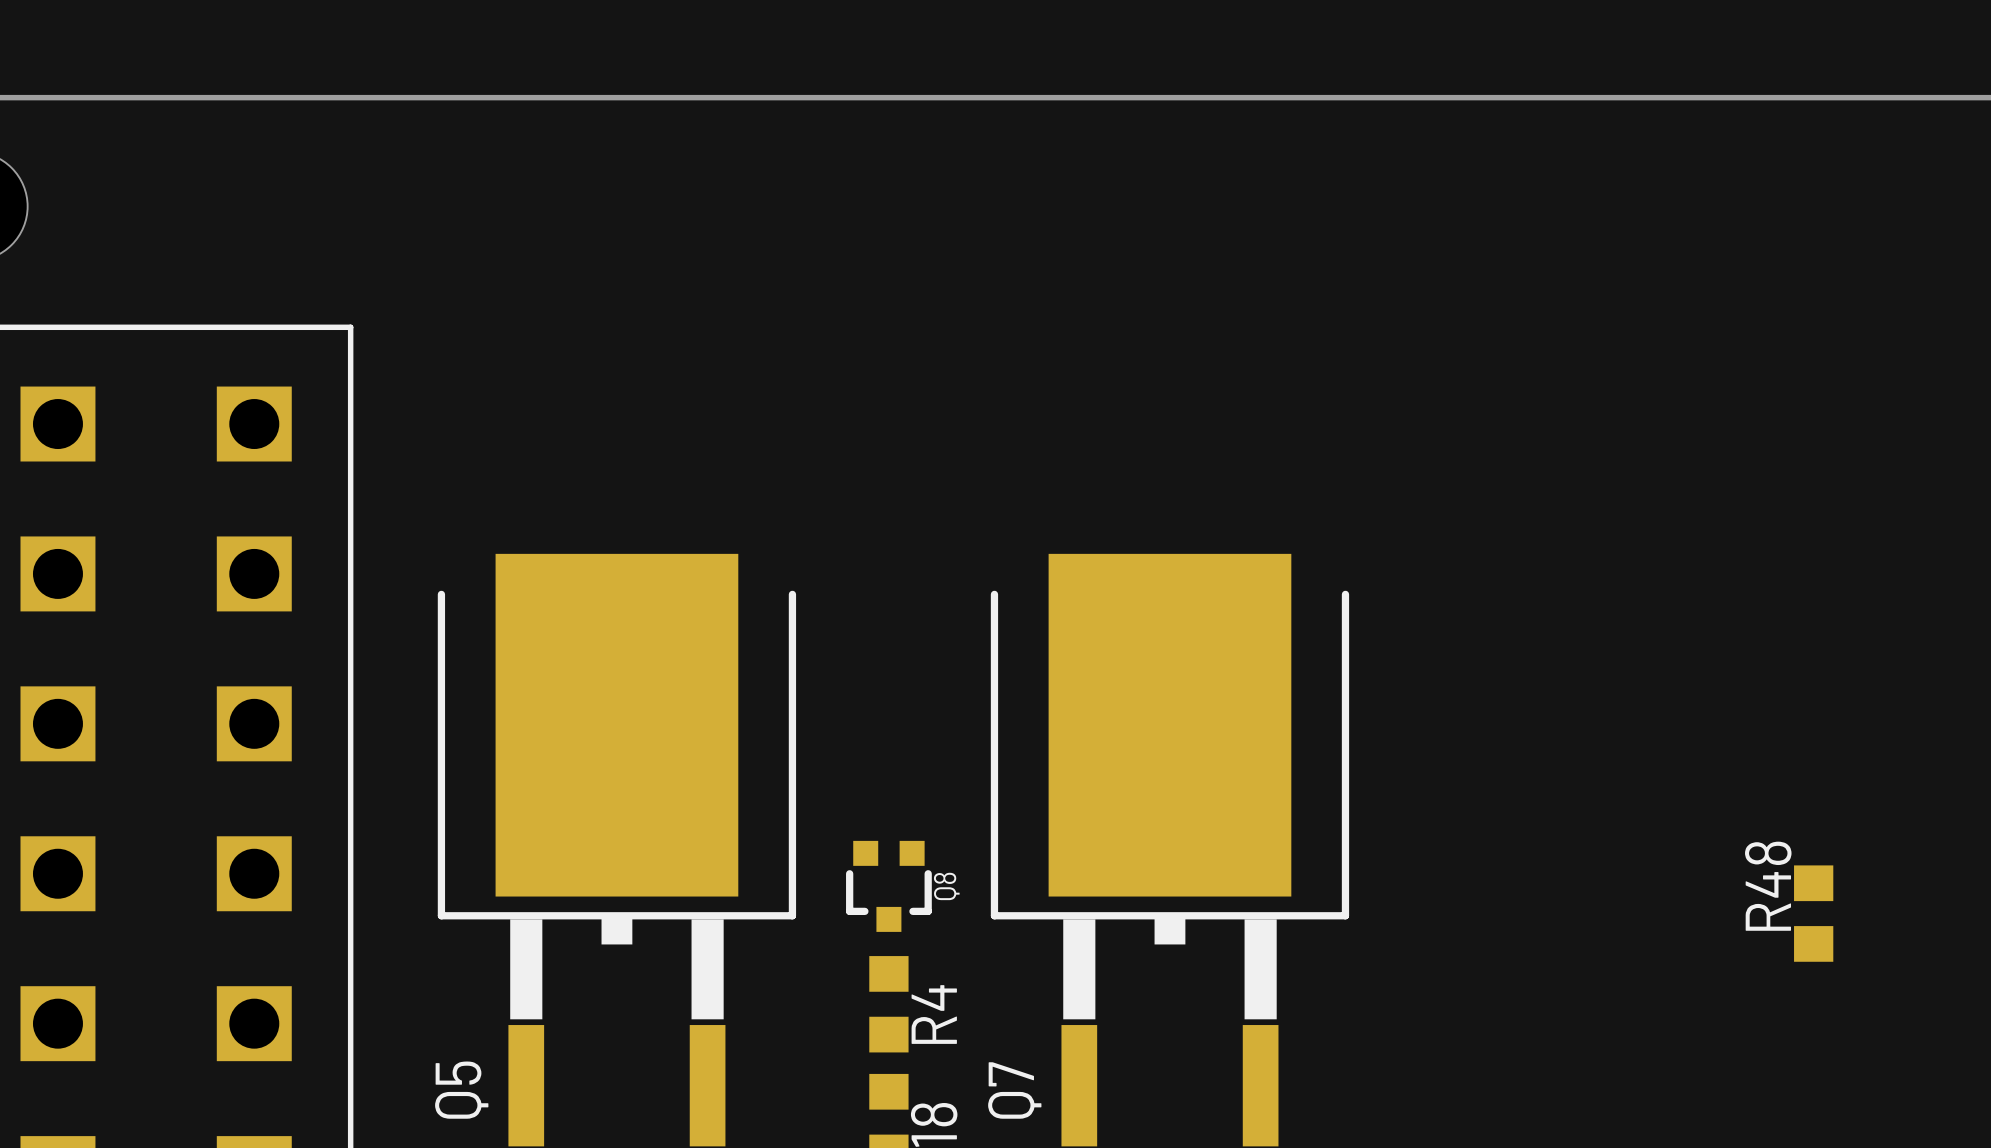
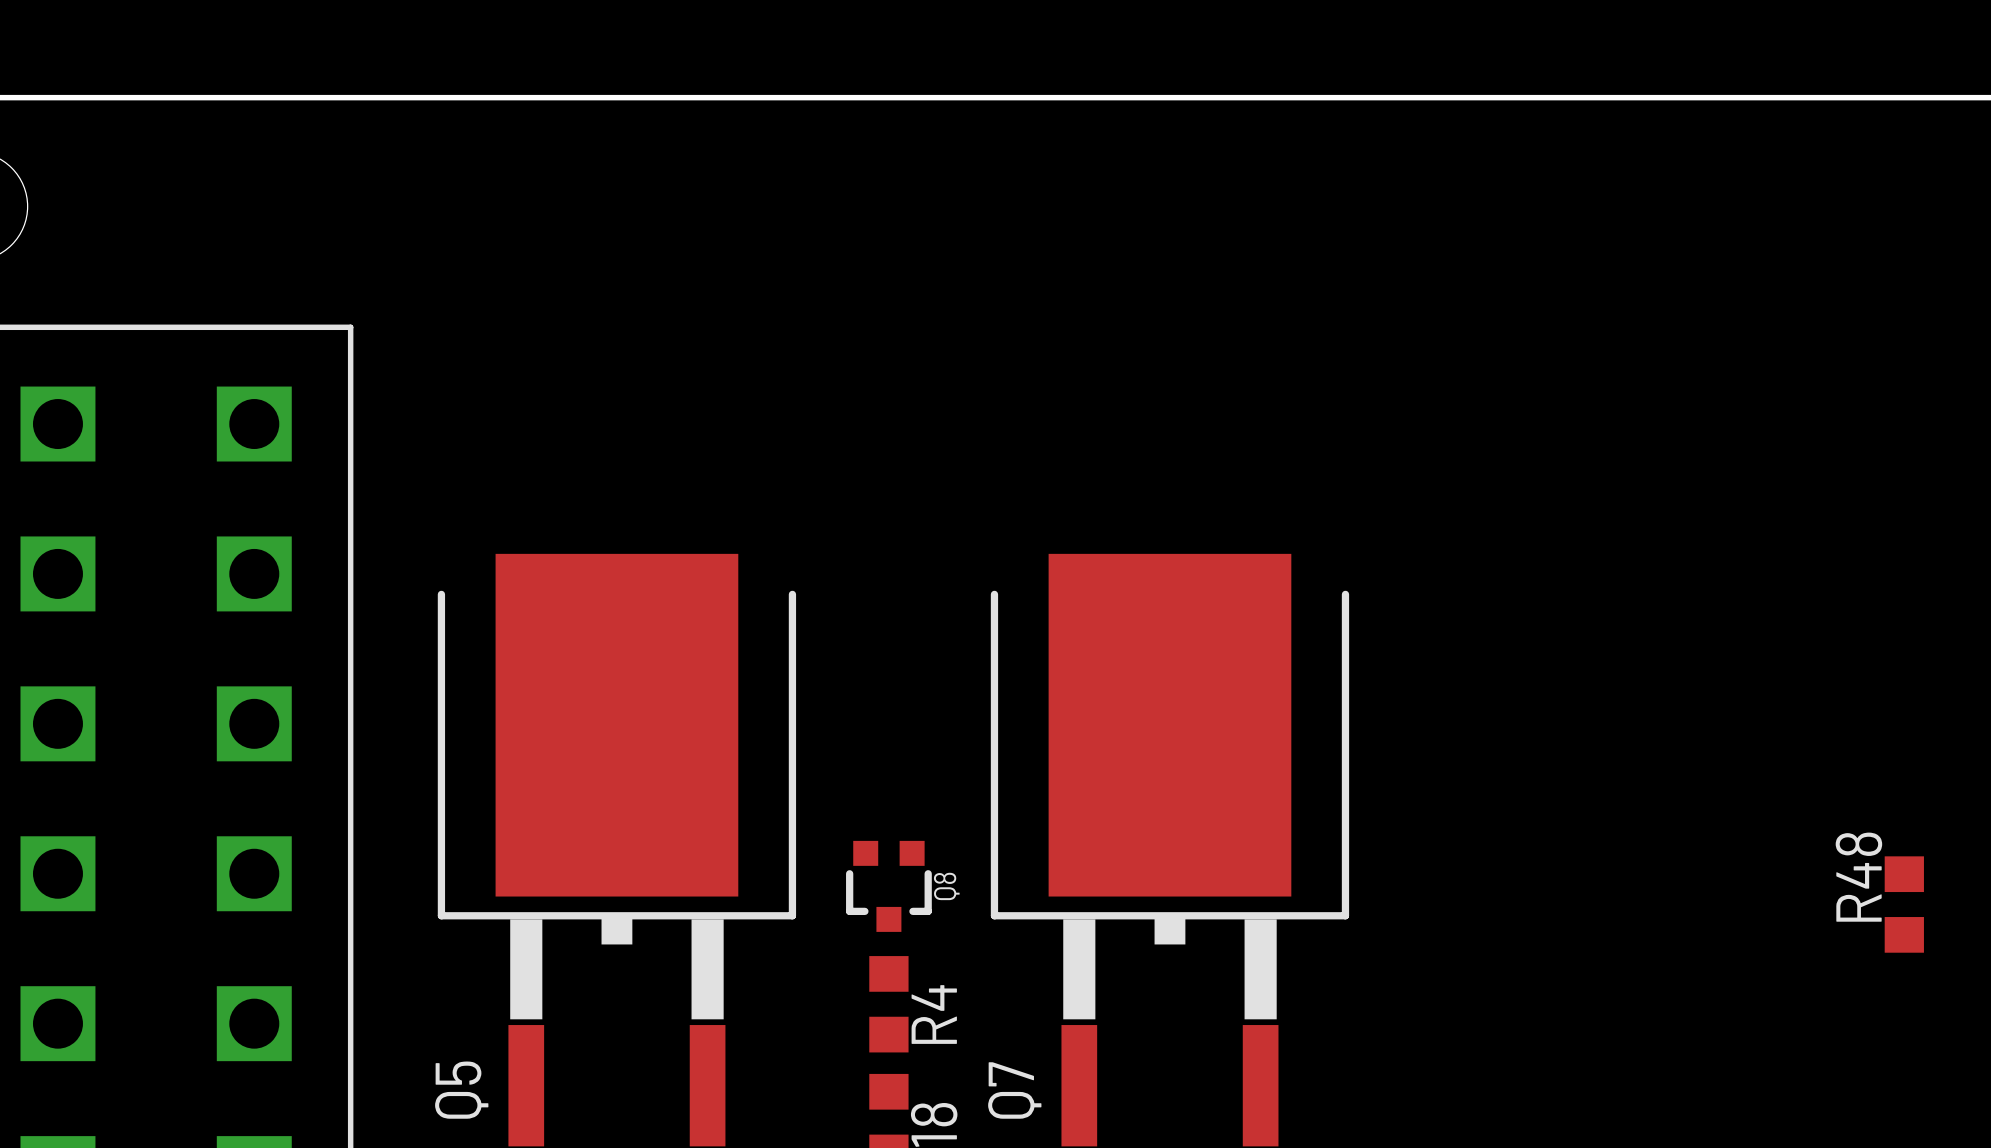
R48 position: (1813, 913) -> (1904, 904)

